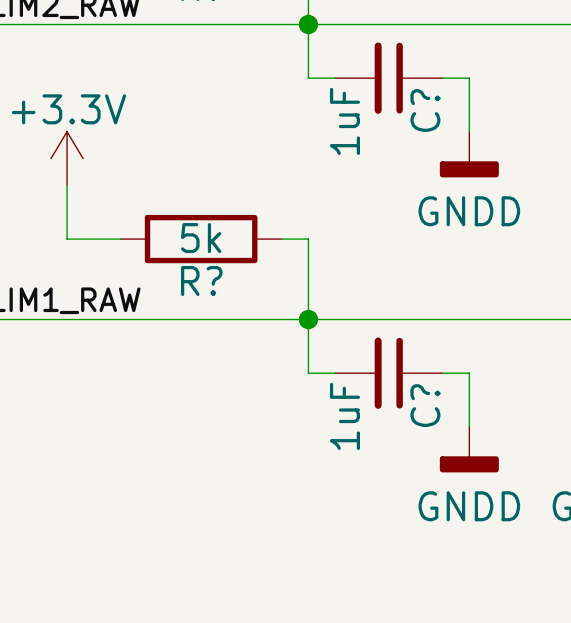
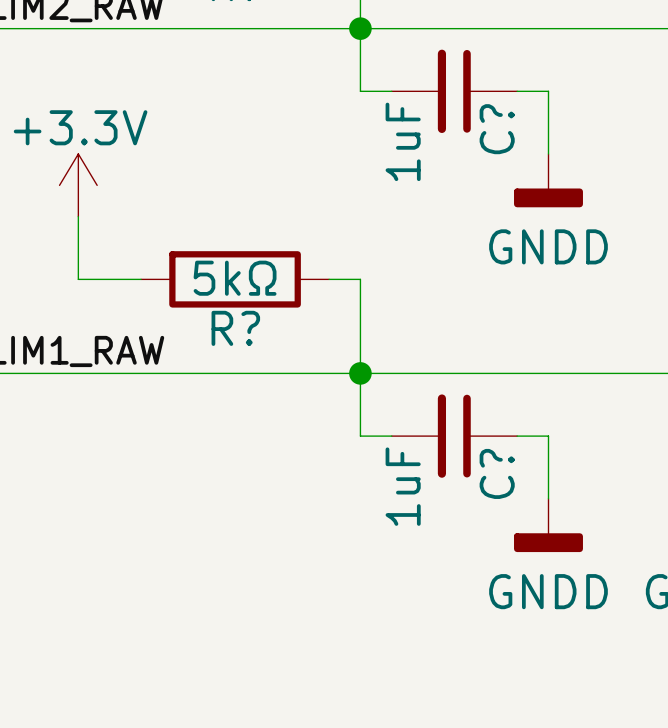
R? value: 5k (201, 238) -> 5kΩ (235, 278)

